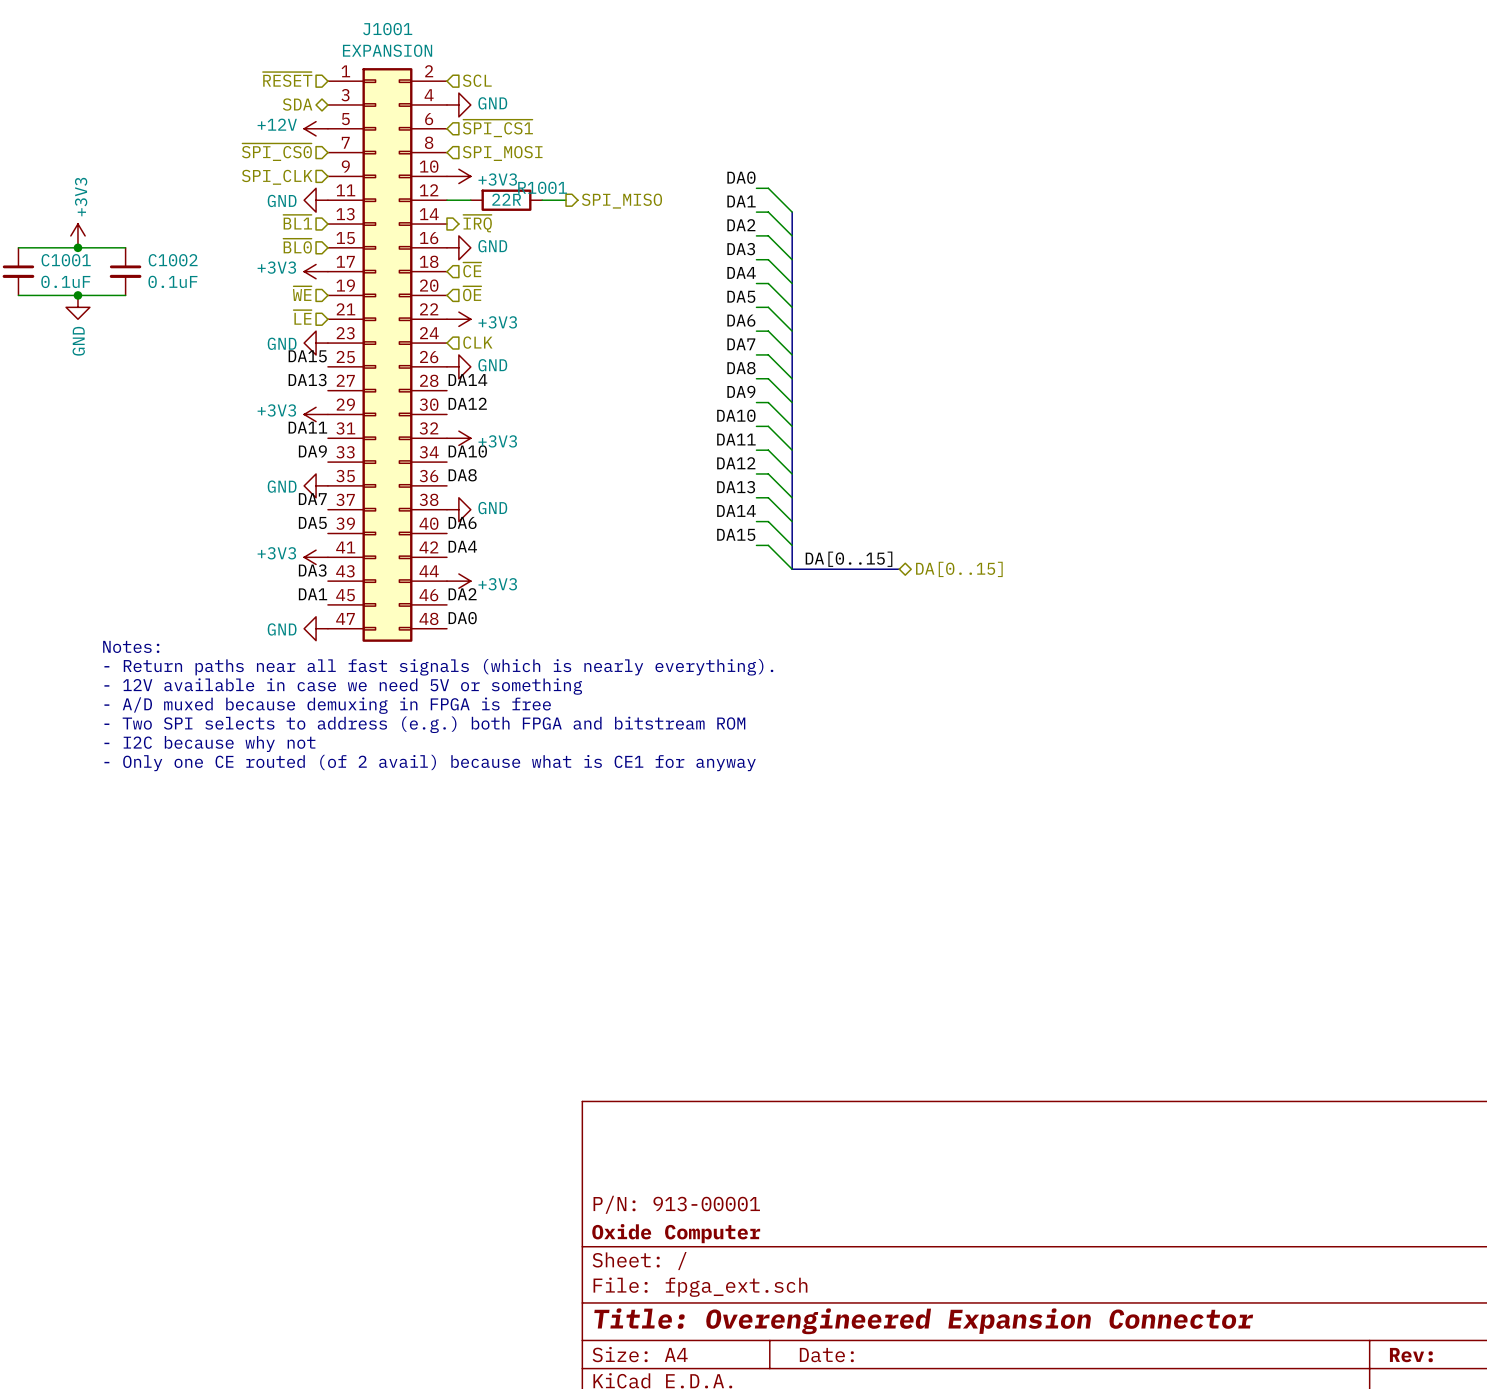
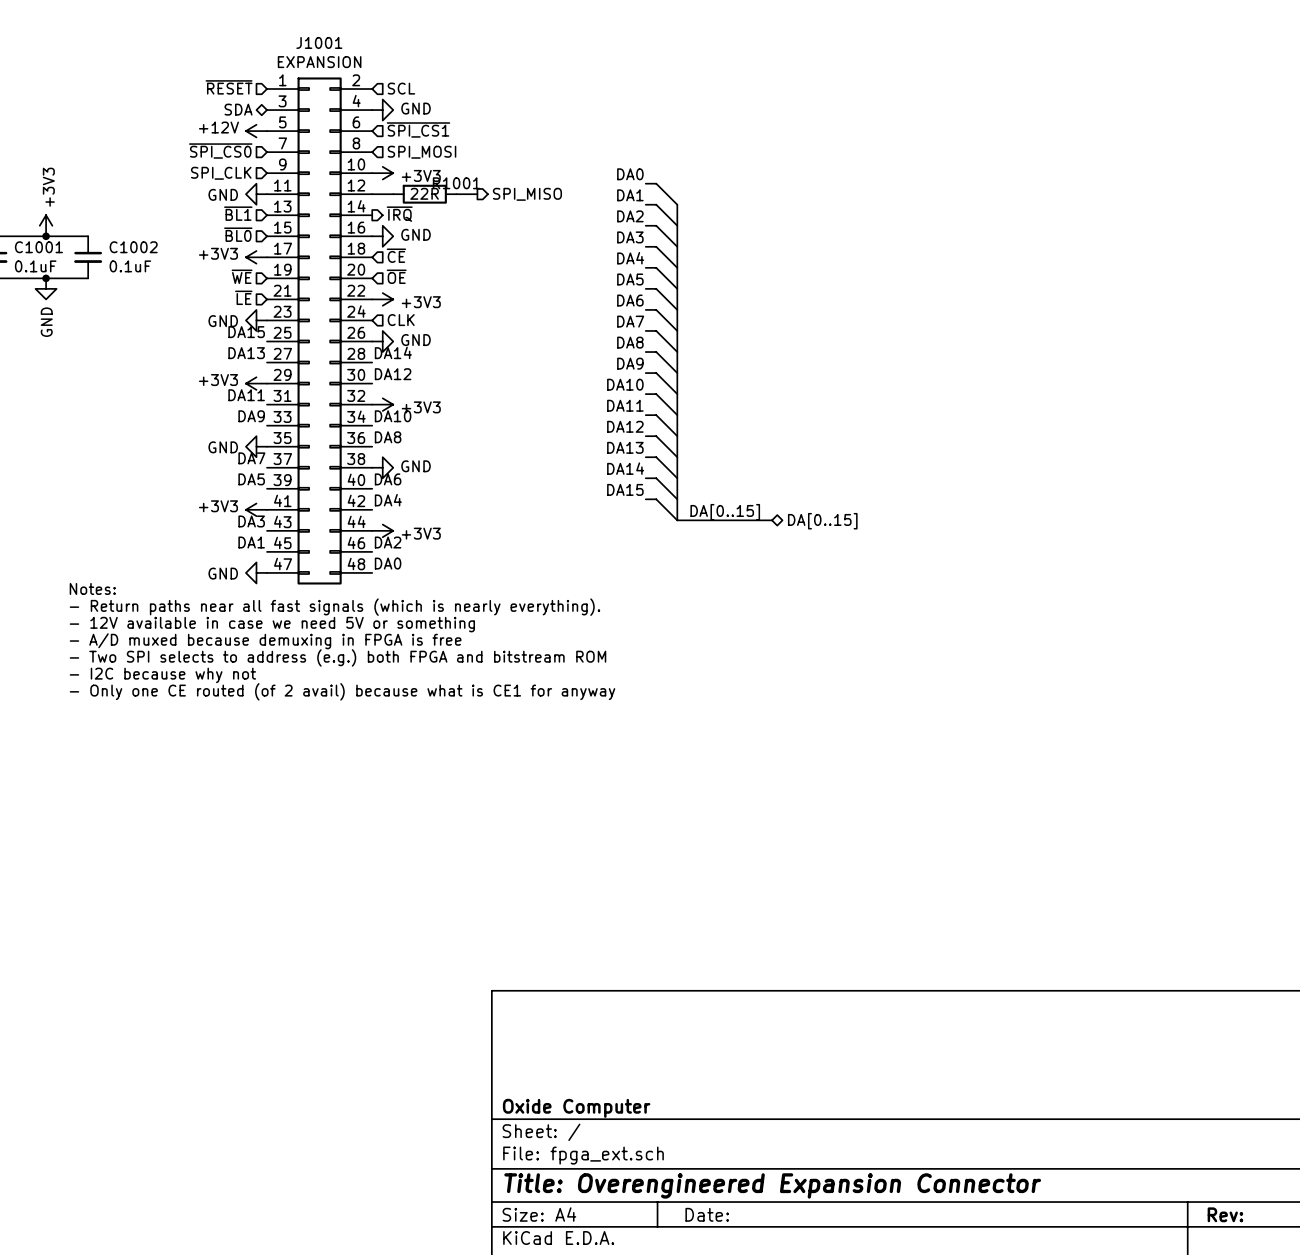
title block: P/N: 913-00001 (676, 1204) -> none

